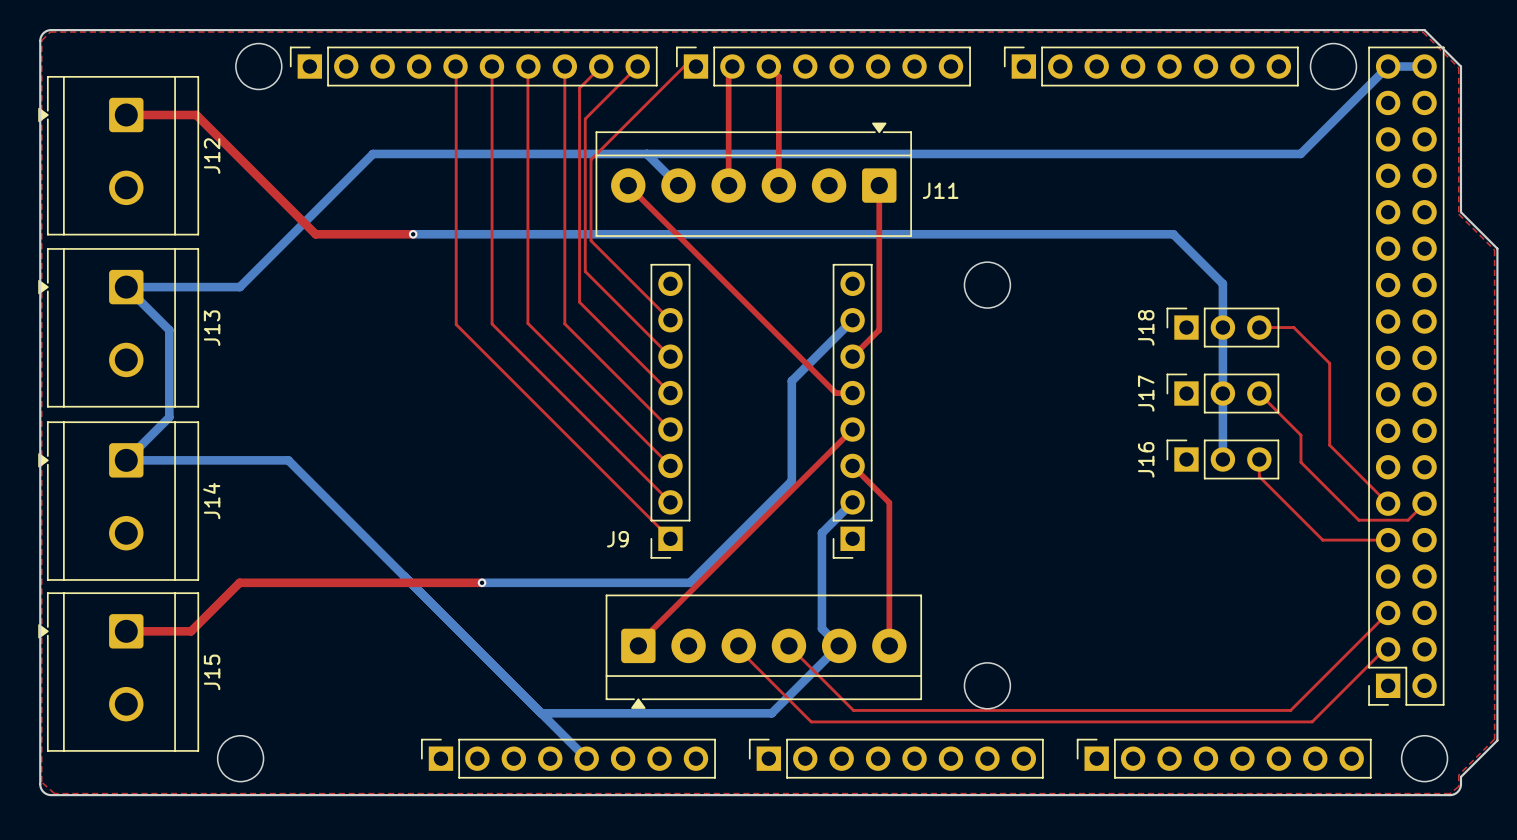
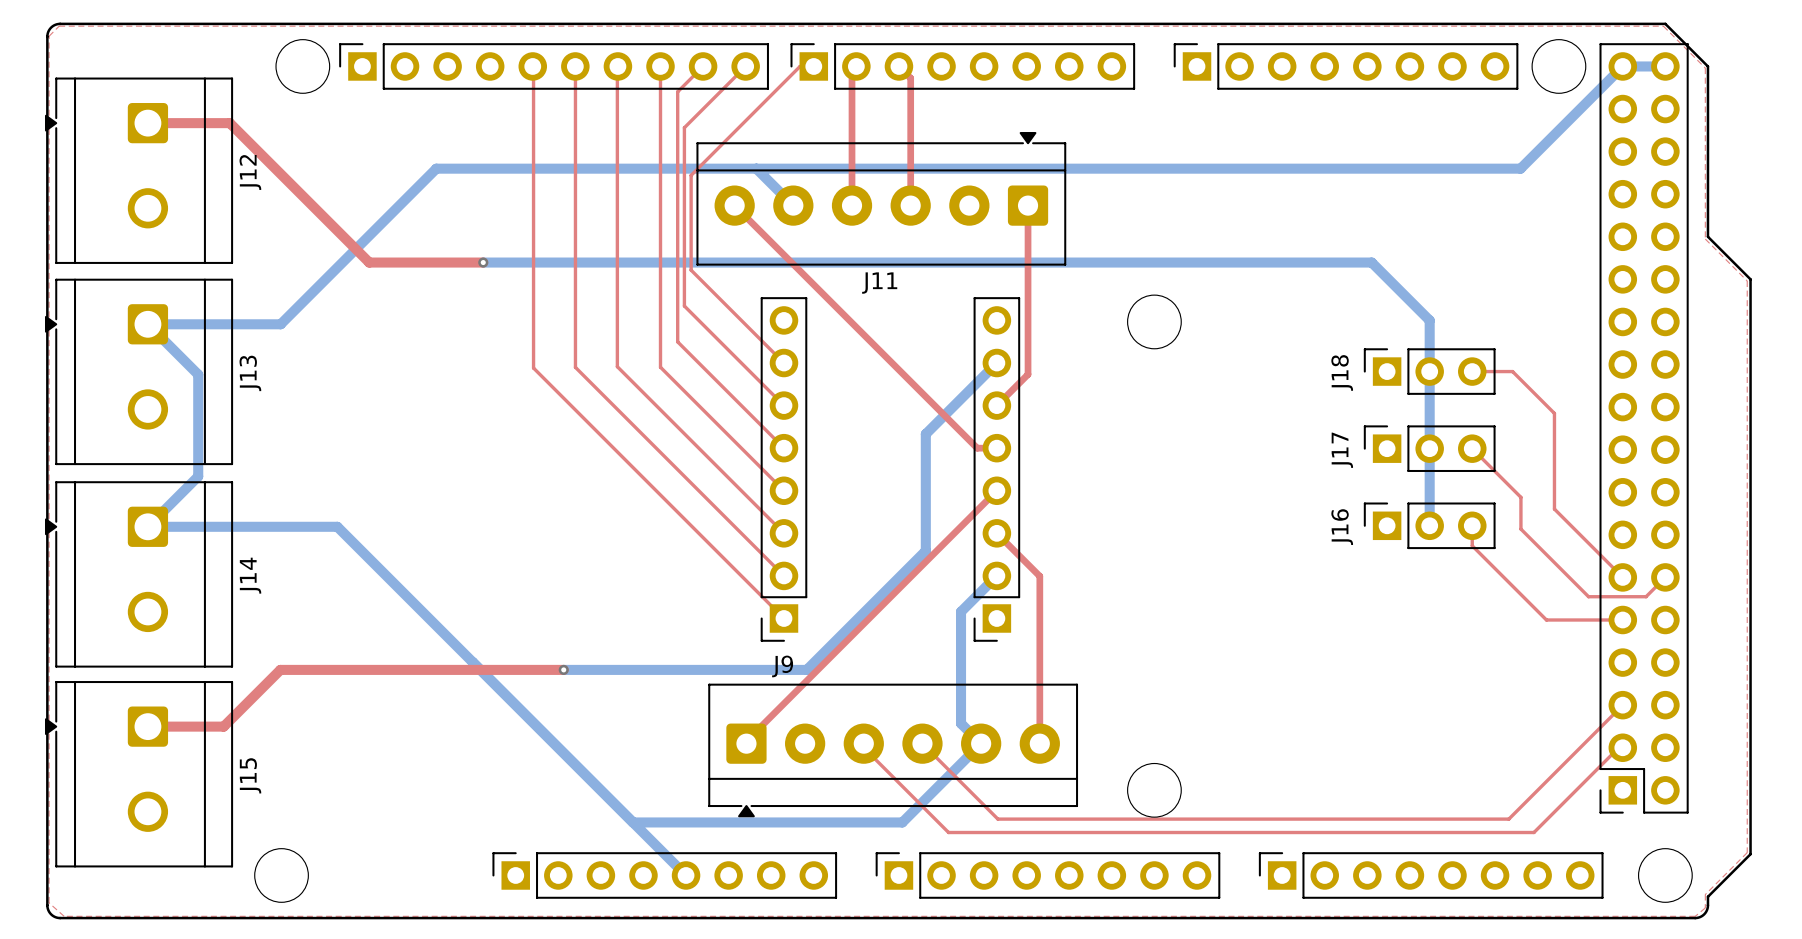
J11 name position: J11 (940, 190) -> J11 (879, 283)
J9 name position: J9 (617, 539) -> J9 (782, 666)

